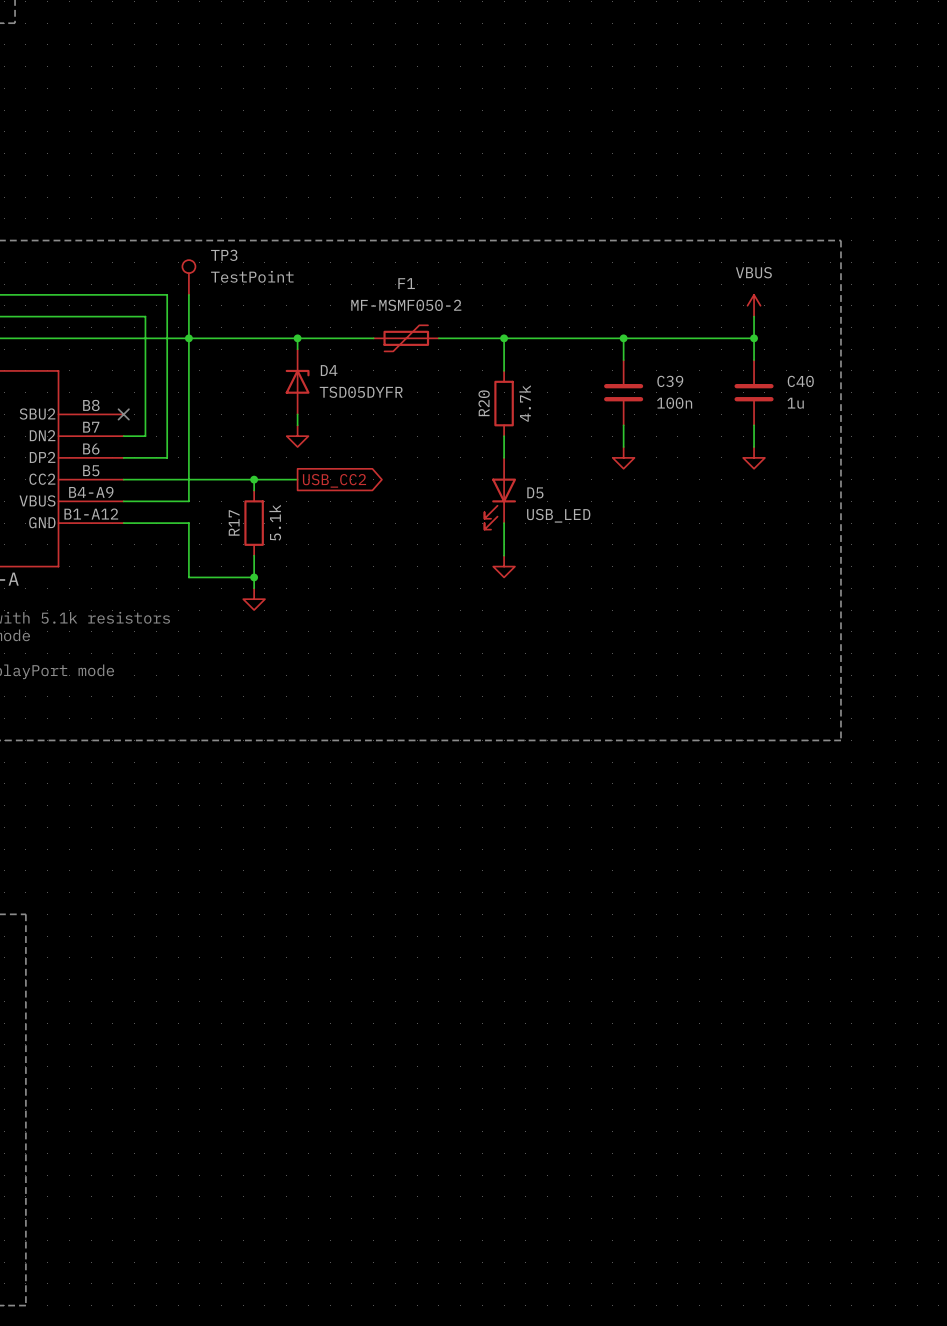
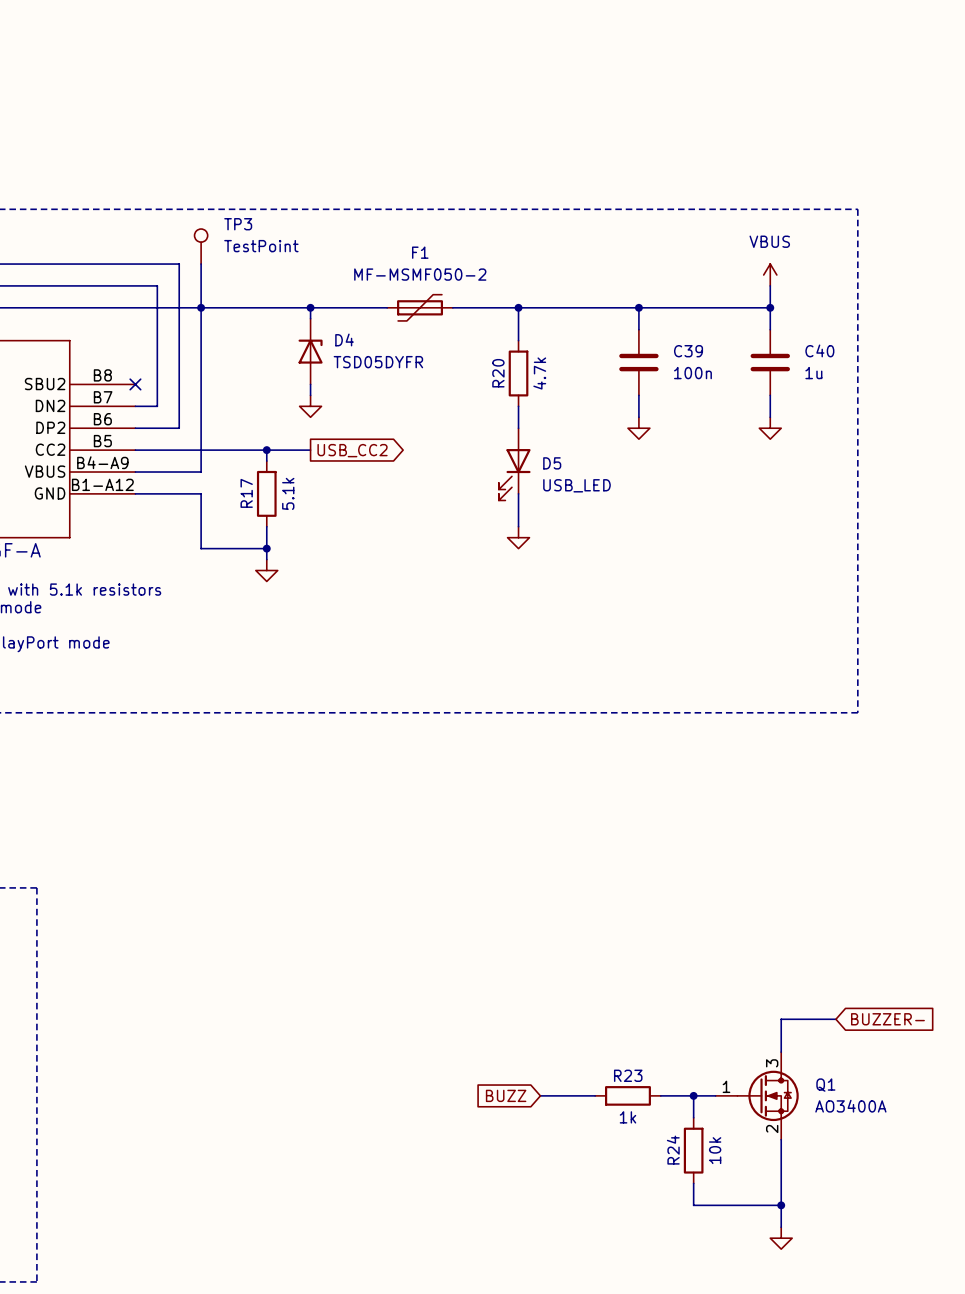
wire: none -> (835, 1019) (781, 1019) (781, 1052)
global label: none -> BUZZER- (887, 1019)
global label: none -> BUZZ (506, 1095)
wire: none -> (540, 1095) (595, 1095)
R23: none -> 1k (627, 1095)
wire: none -> (660, 1095) (715, 1095)
wire: none -> (693, 1095) (693, 1117)
junction: none -> (693, 1095)
Q1: none -> AO3400A (757, 1095)
wire: none -> (781, 1139) (781, 1227)
R24: none -> 10k (693, 1150)
wire: none -> (693, 1183) (693, 1205) (781, 1205)
junction: none -> (781, 1205)
power symbol: none -> (781, 1238)

